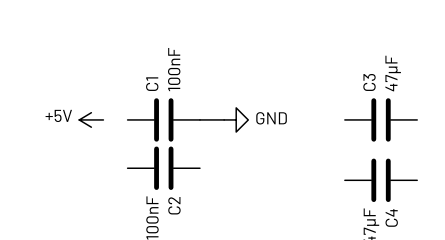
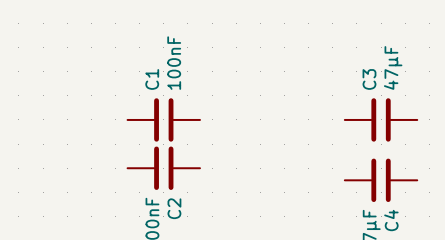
power symbol: +5V (91, 119) -> none
wire: (199, 119) (224, 119) -> none
power symbol: GND (236, 119) -> none

